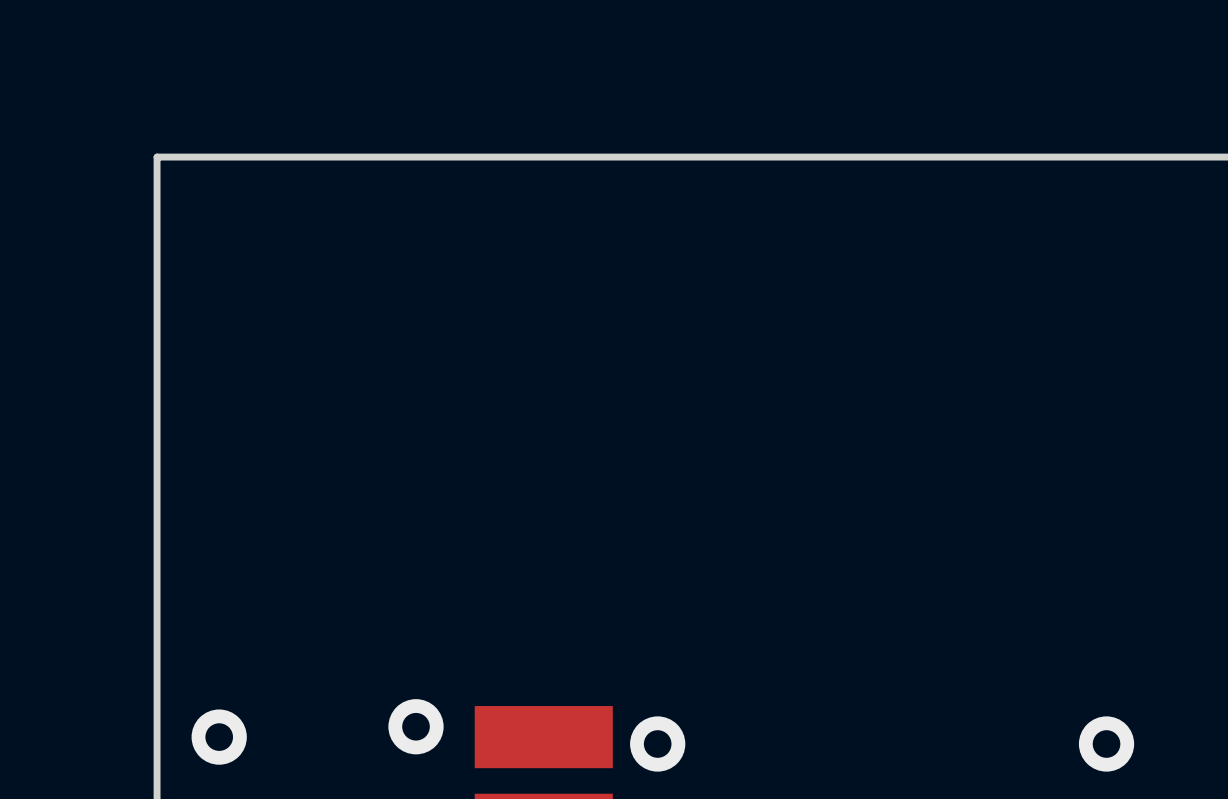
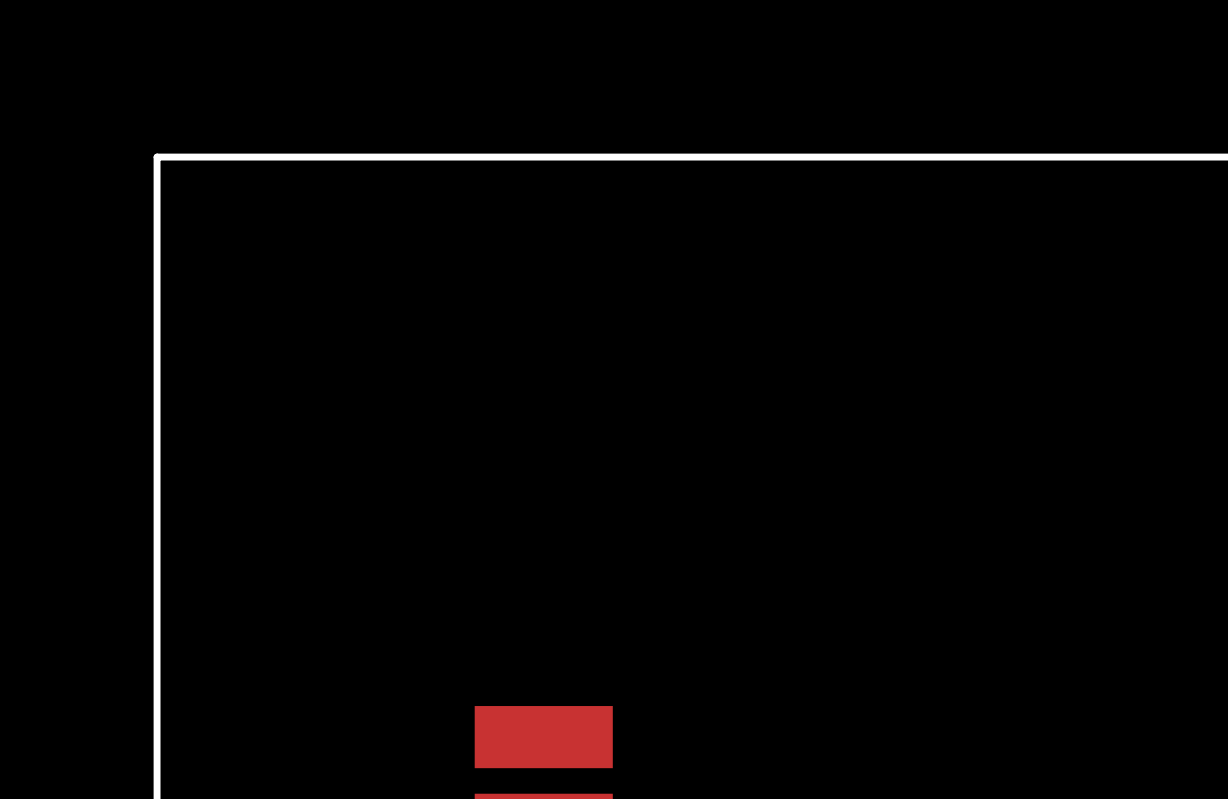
via: (416, 726) -> none
via: (219, 737) -> none
via: (657, 744) -> none
via: (1106, 744) -> none

